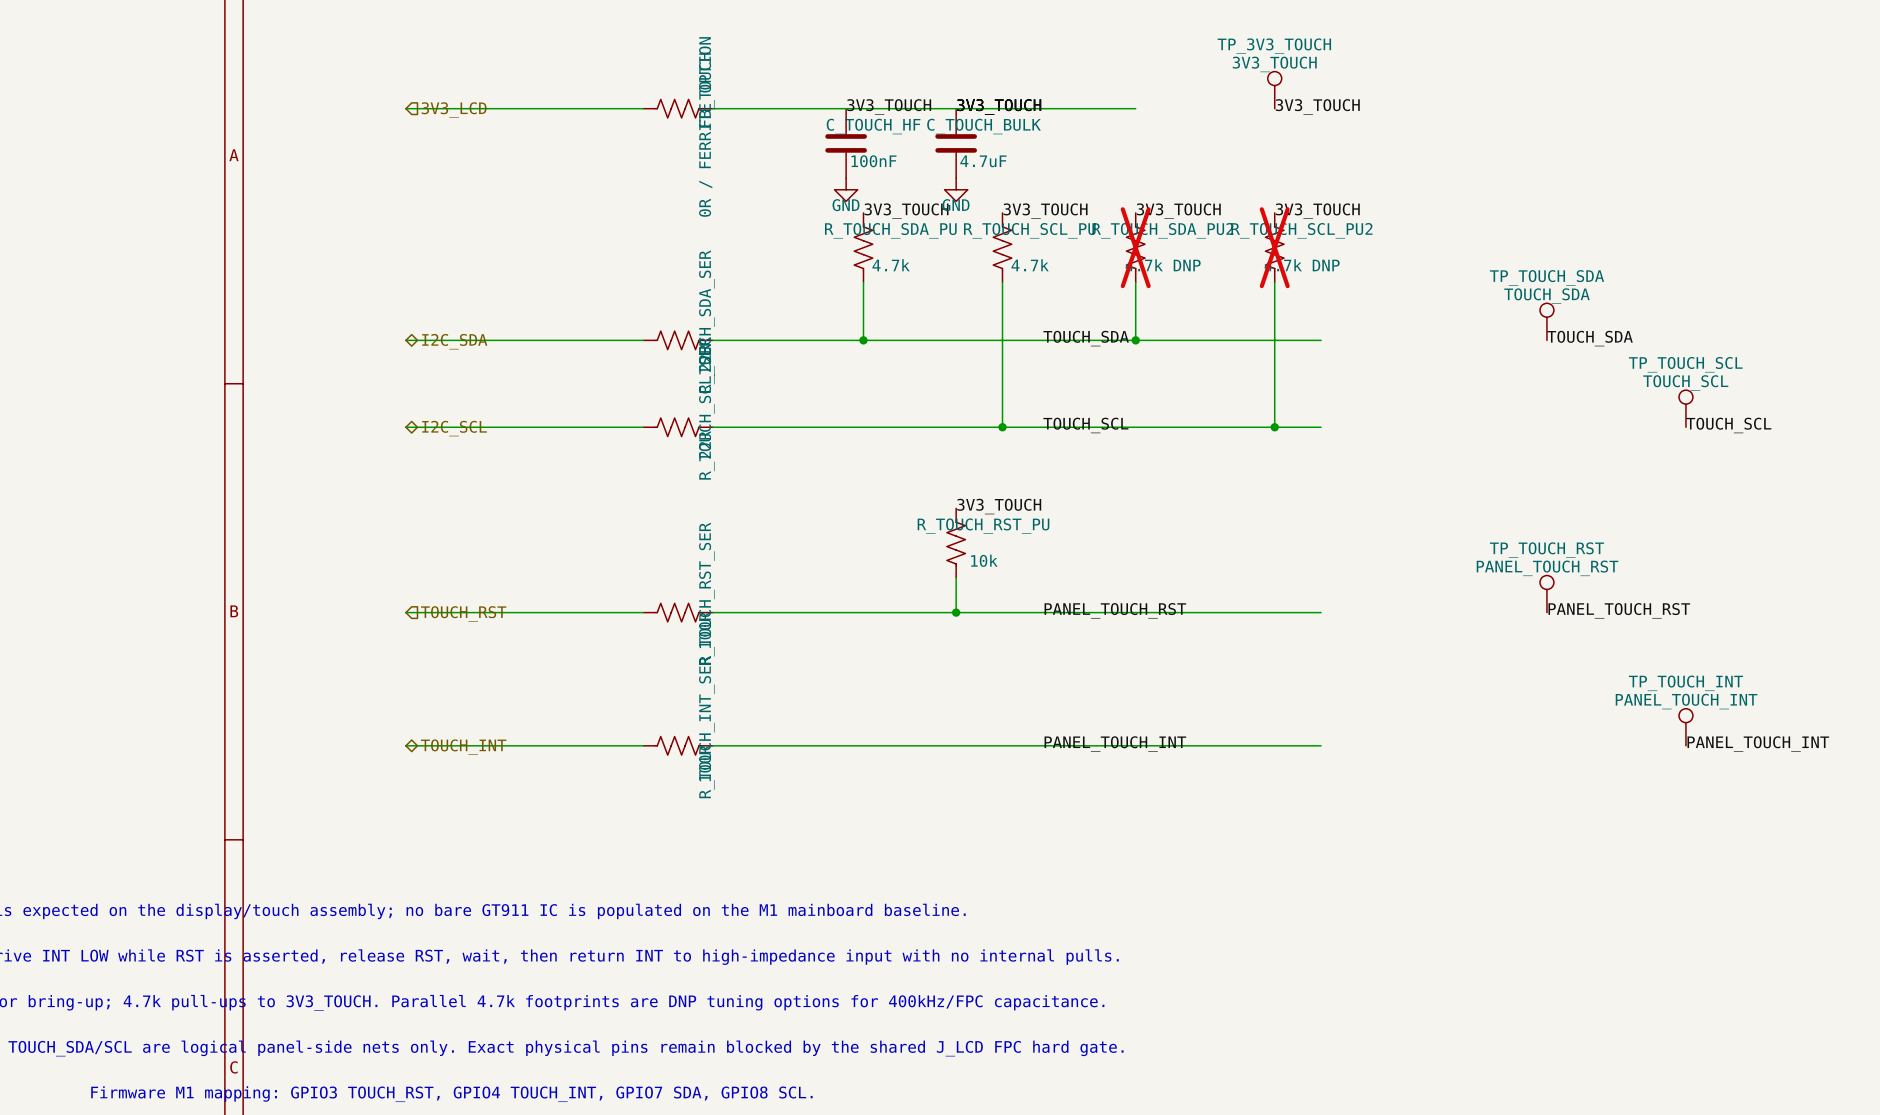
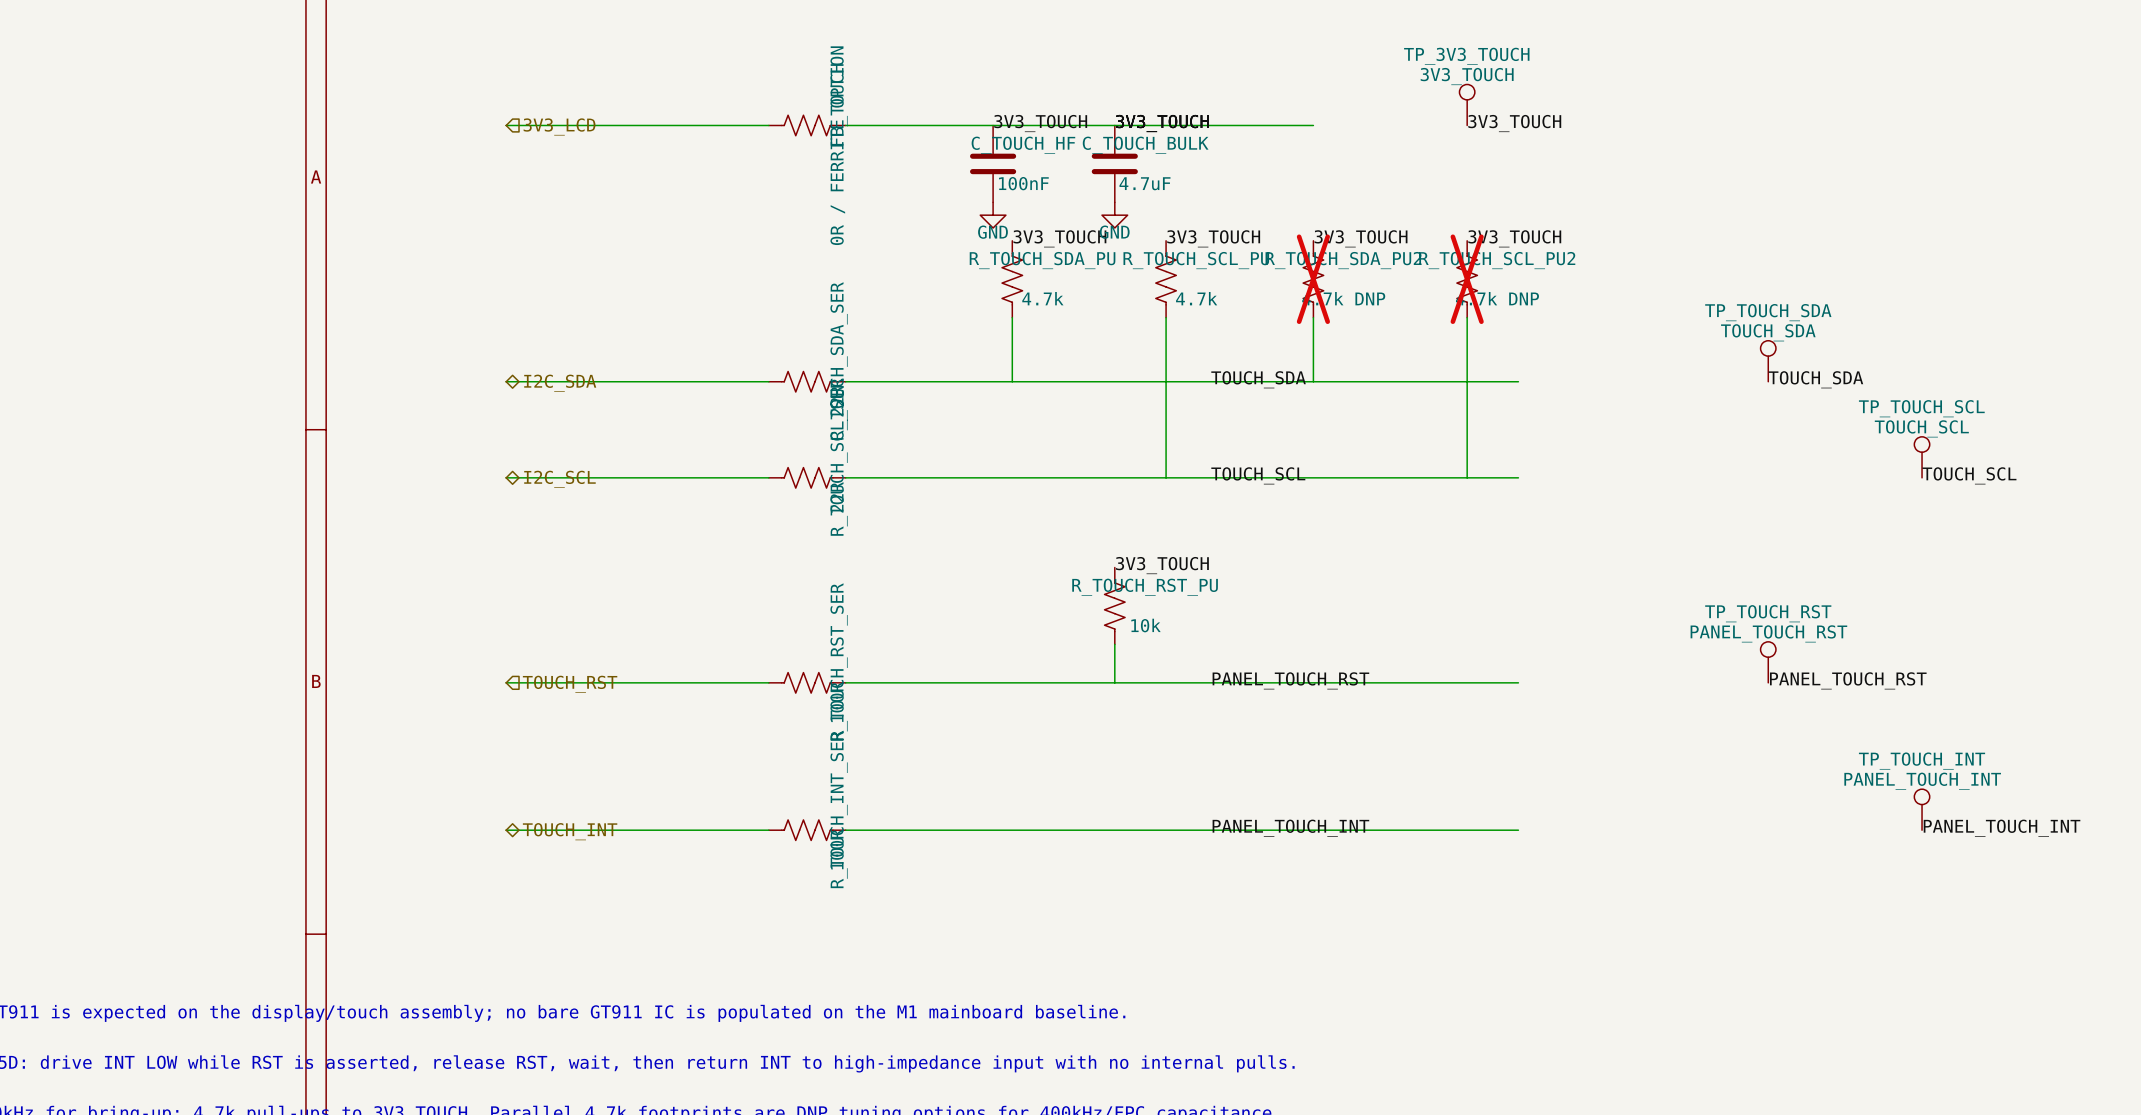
junction: (863, 340) -> none
junction: (1135, 340) -> none
junction: (1002, 427) -> none
junction: (1274, 427) -> none
junction: (956, 612) -> none

